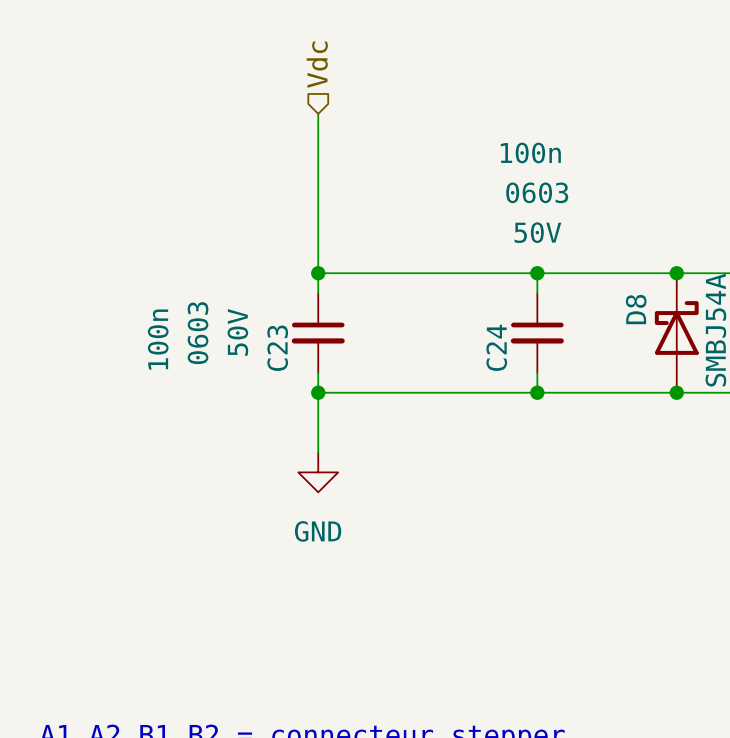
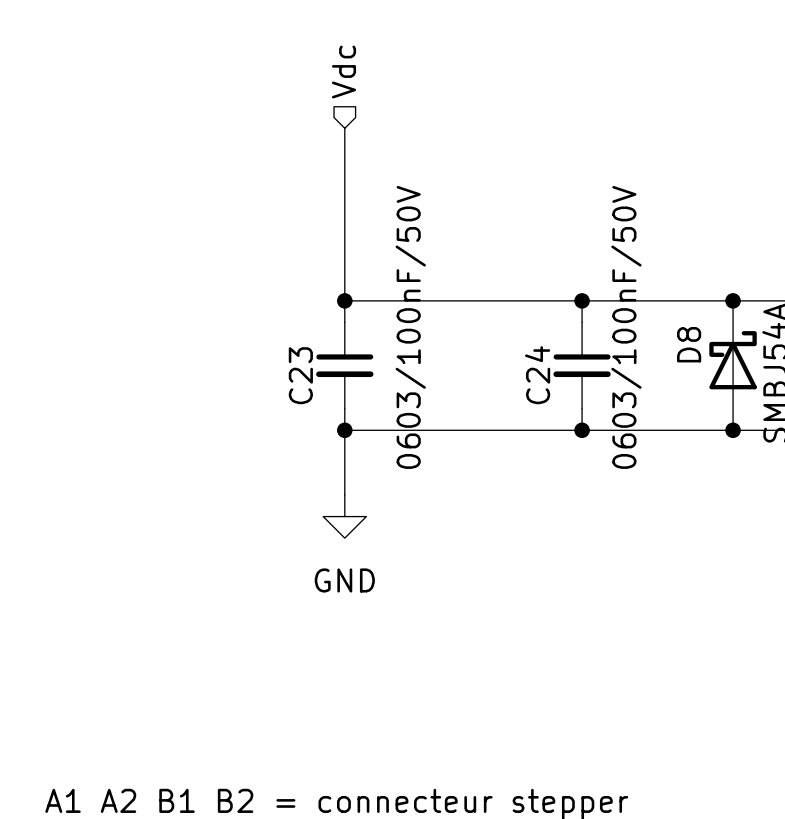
C24 value: 100n (530, 153) -> 0603/100nF/50V (626, 327)
C24 text: 0603 (537, 192) -> none
C24 text: 50V (537, 232) -> none
C23 text: 50V (237, 332) -> none
C23 text: 0603 (198, 333) -> none
C23 value: 100n (158, 339) -> 0603/100nF/50V (410, 327)

